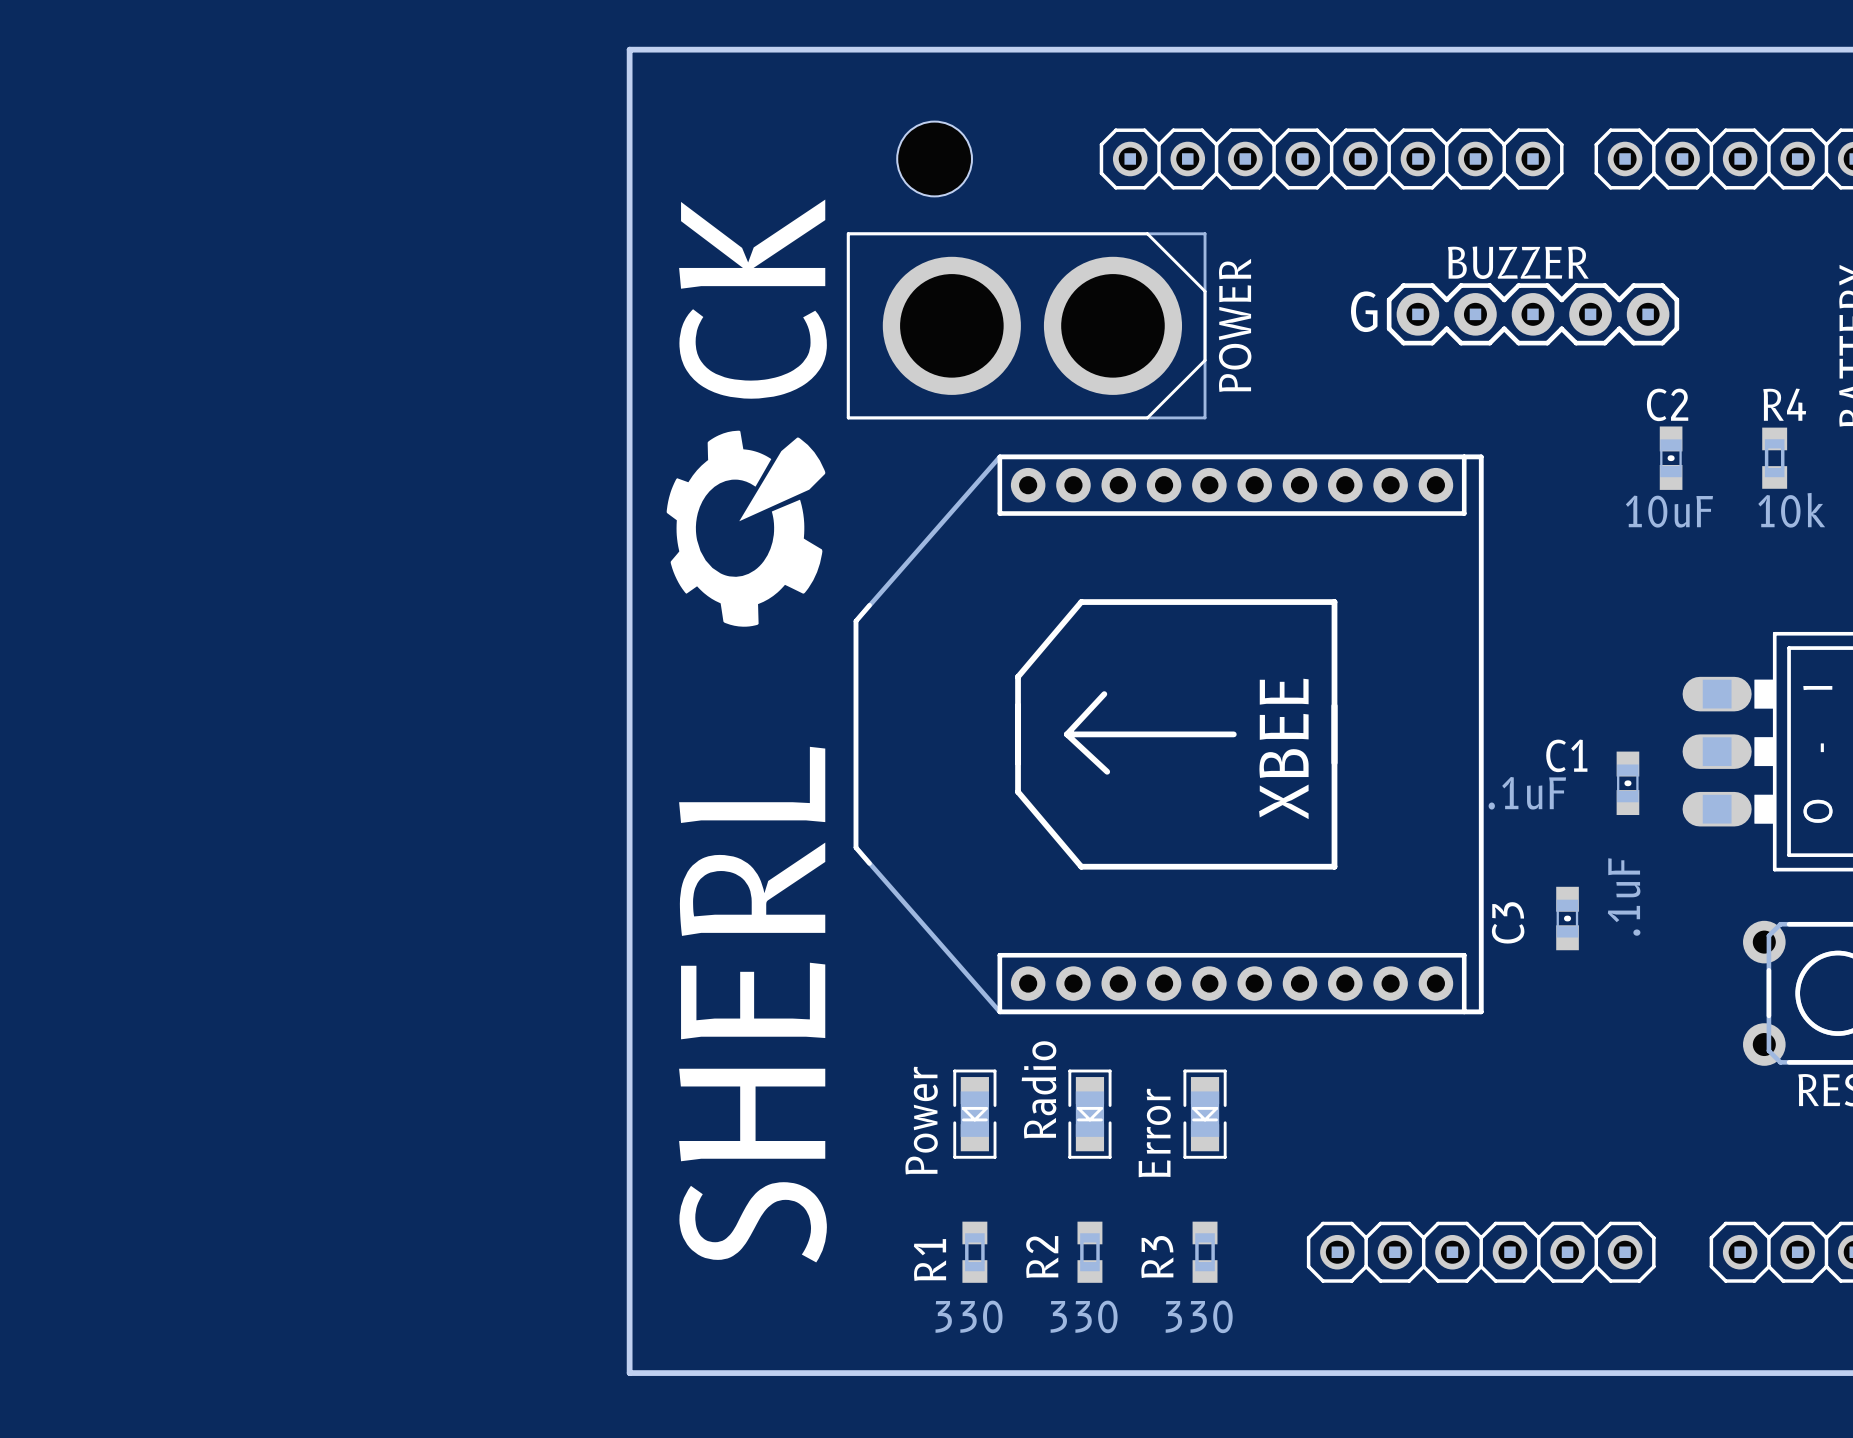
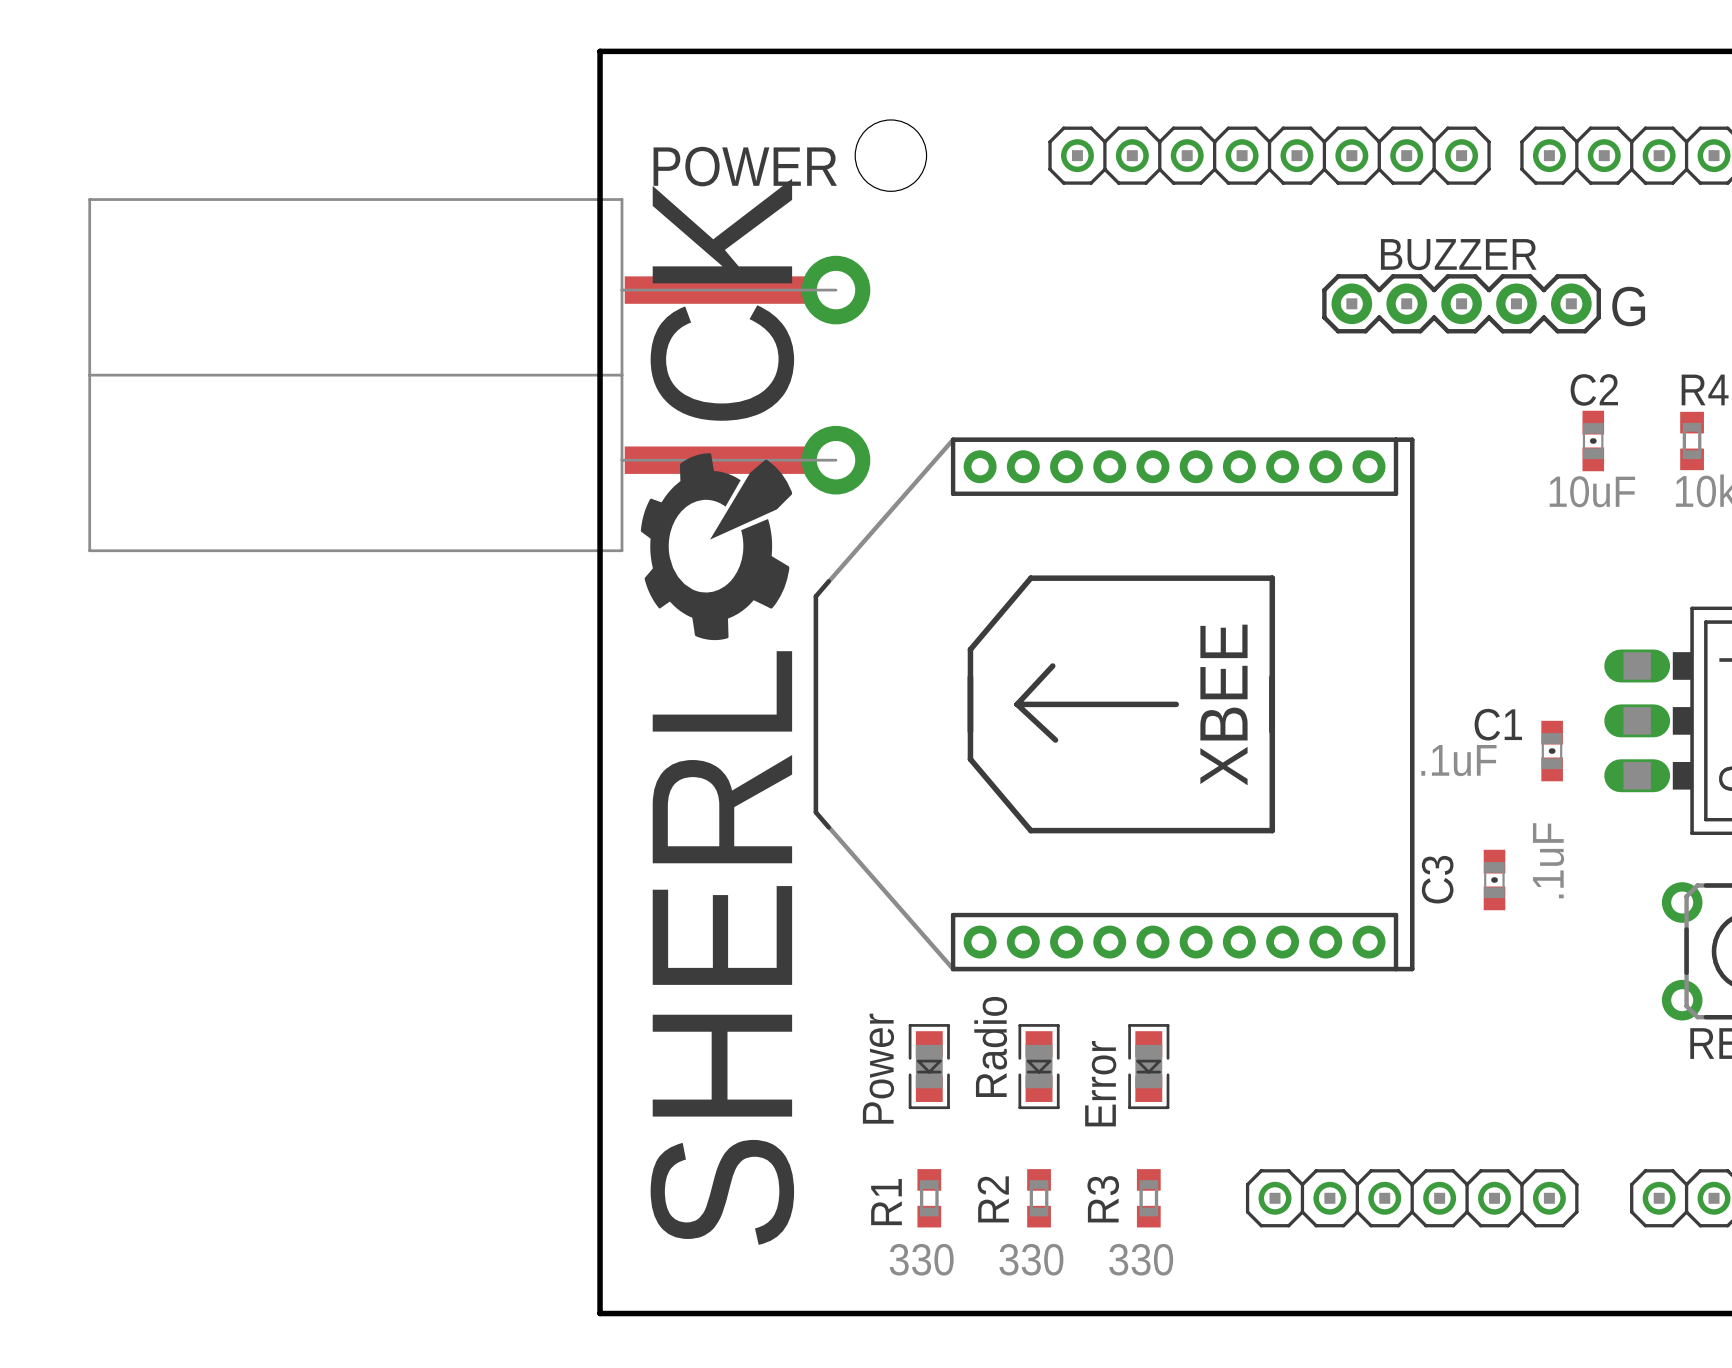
text position: G (1364, 311) -> G (1628, 306)
part: (1026, 325) -> none
text: POWER (1235, 325) -> none
POWER: none -> (479, 375)
drawing position: (745, 528) -> (716, 546)

